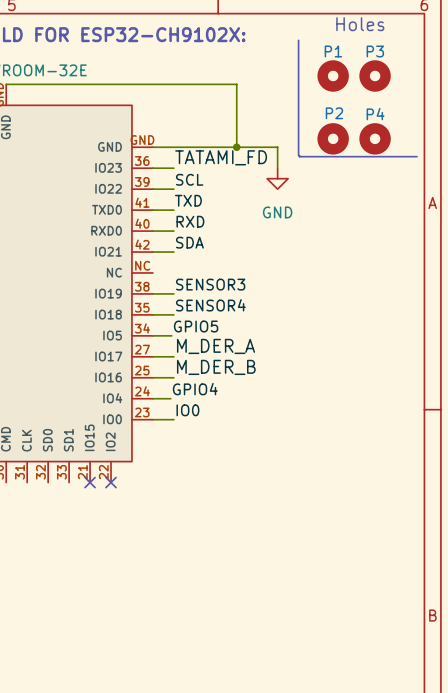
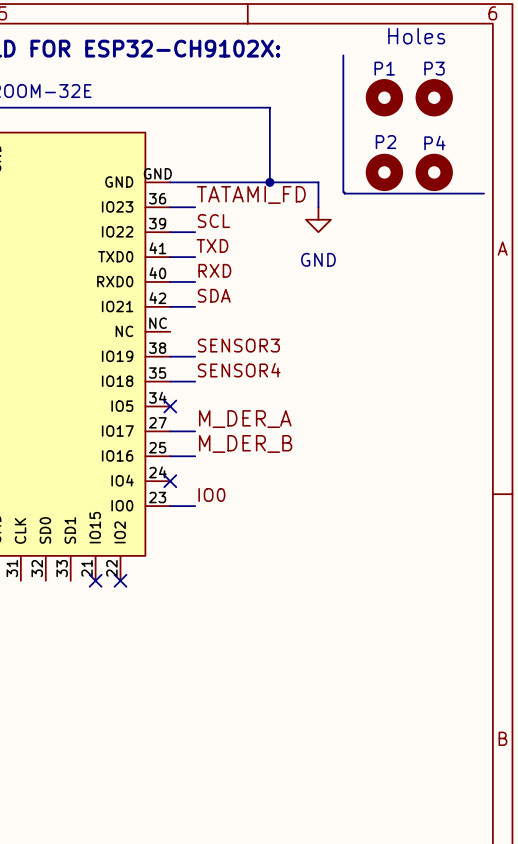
label: GPIO5 (196, 326) -> none
wire: (152, 335) (171, 335) -> none
no-connect mark: none -> (170, 406)
label: GPIO4 (195, 389) -> none
wire: (152, 398) (170, 398) -> none
no-connect mark: none -> (170, 481)

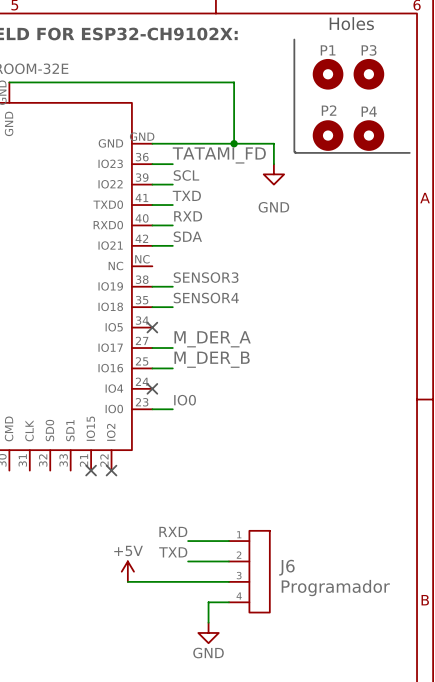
label: none -> RXD (173, 531)
wire: none -> (188, 541) (228, 541)
label: none -> TXD (173, 552)
wire: none -> (188, 561) (228, 561)
power symbol: none -> +5V (127, 571)
J6: none -> Programador (249, 571)
wire: none -> (127, 581) (228, 581)
wire: none -> (228, 602) (208, 602) (208, 622)
power symbol: none -> GND (208, 632)

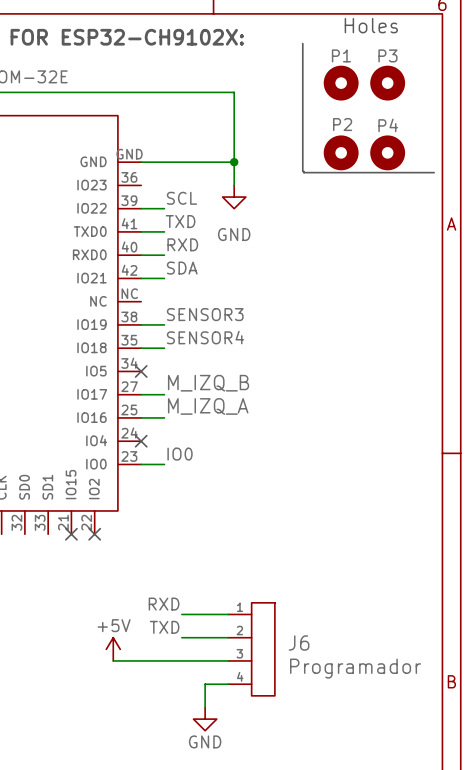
wire: (234, 143) (273, 143) (273, 164) -> (234, 162) (234, 185)
label: TATAMI_FD (219, 155) -> none
wire: (152, 164) (172, 164) -> none
power symbol position: GND (273, 174) -> GND (234, 197)
label: M_DER_A (212, 339) -> M_IZQ_B (208, 383)
label: M_DER_B (212, 359) -> M_IZQ_A (208, 406)

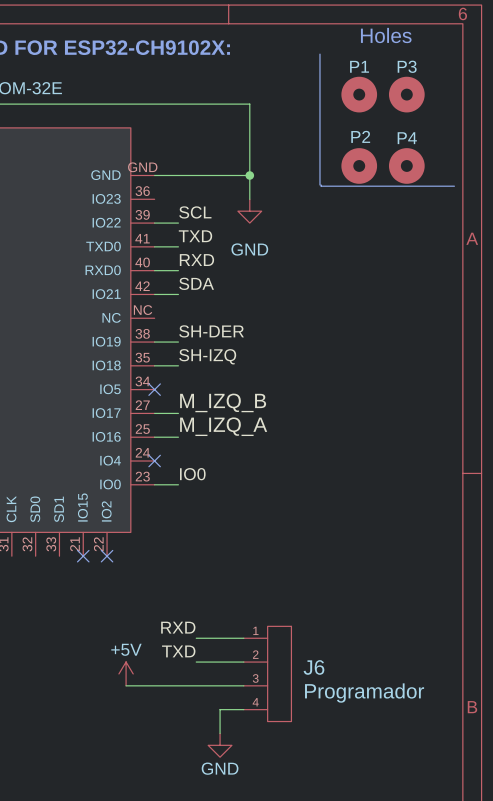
label: SENSOR3 (205, 314) -> SH-DER (211, 331)
label: SENSOR4 (205, 337) -> SH-IZQ (207, 356)

